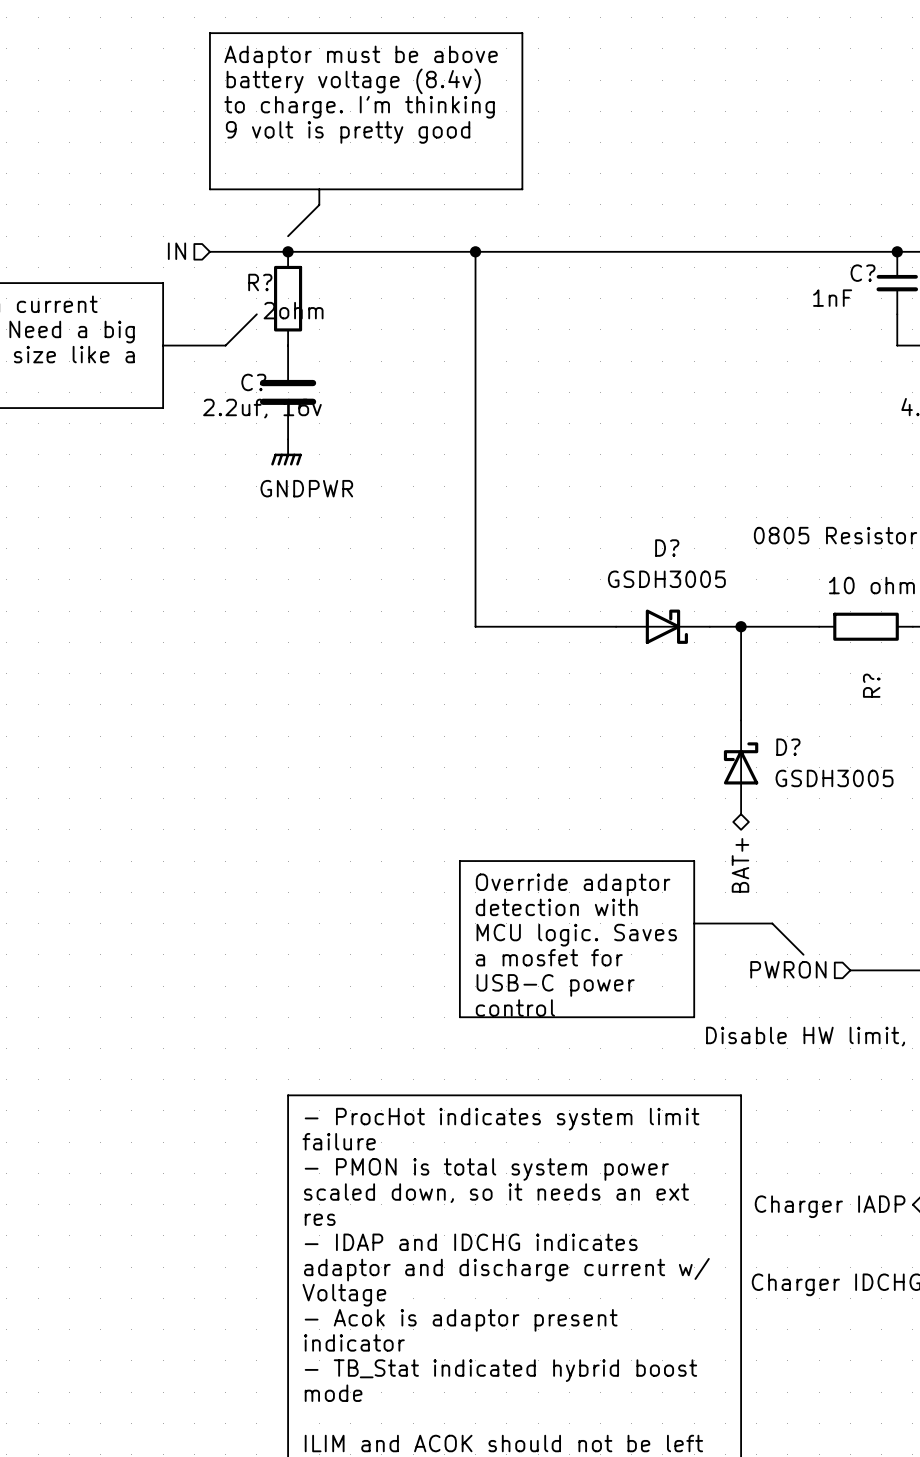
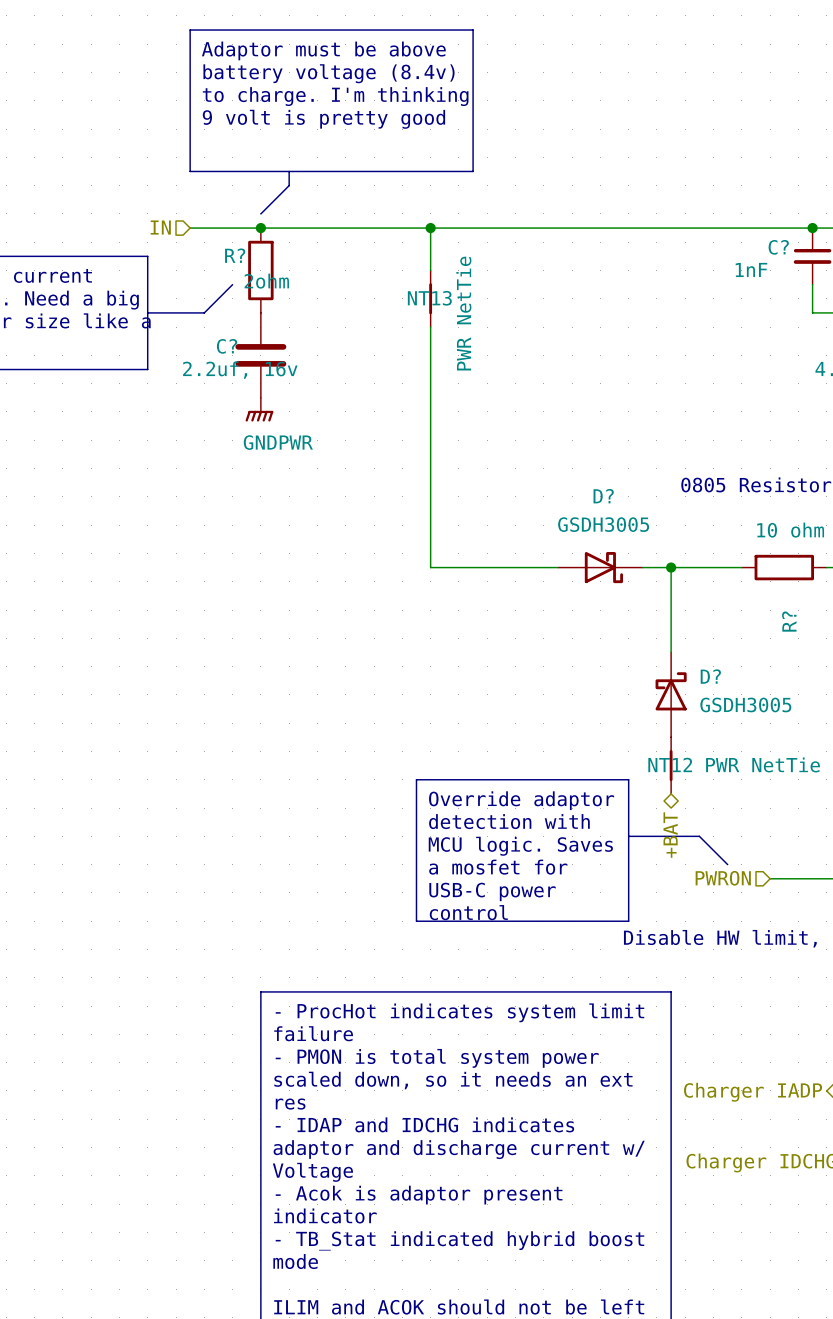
NT13: none -> PWR NetTie (430, 298)
NT12: none -> PWR NetTie (671, 765)
hierarchical label: BAT+ (740, 865) -> +BAT (670, 835)

